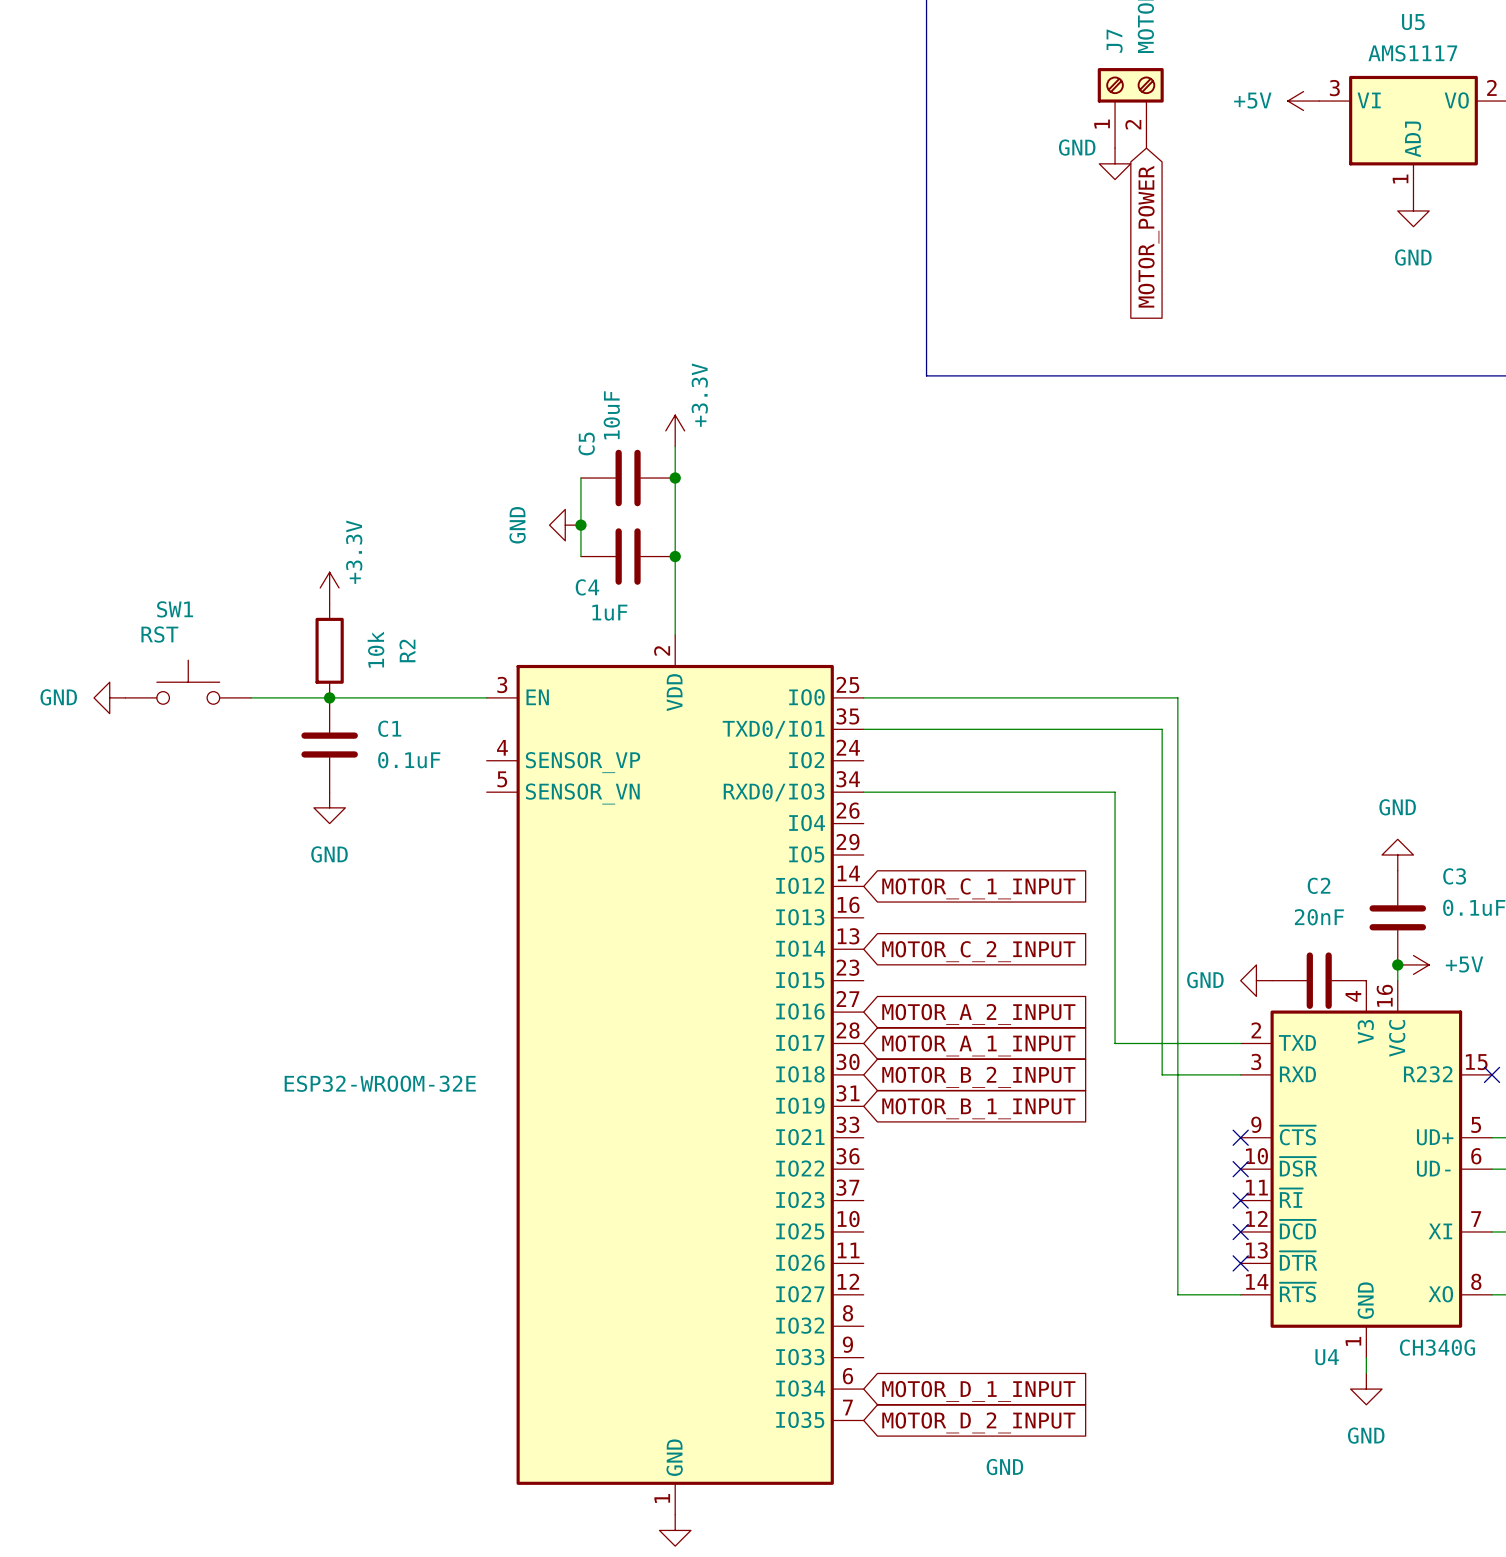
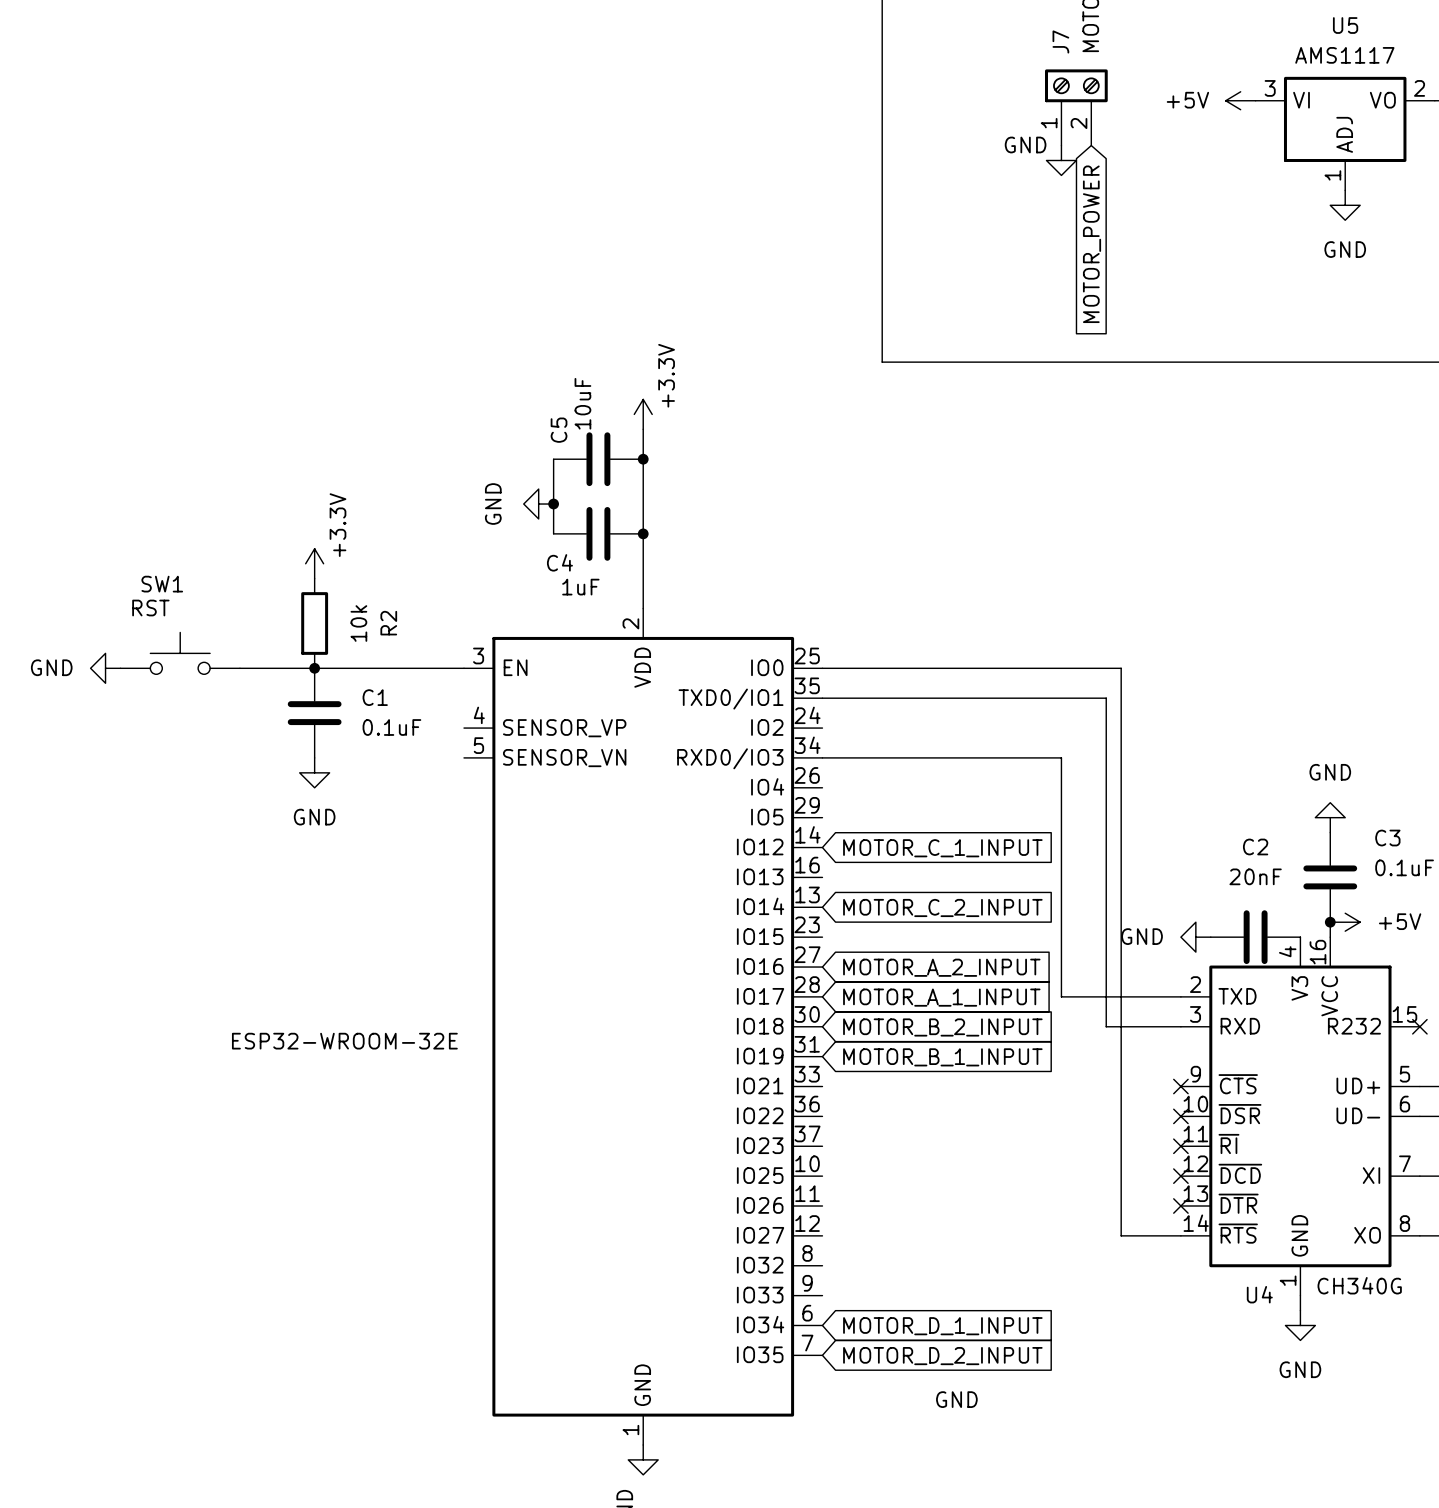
part value position: ESP32-WROOM-32E (380, 1083) -> ESP32-WROOM-32E (344, 1041)

